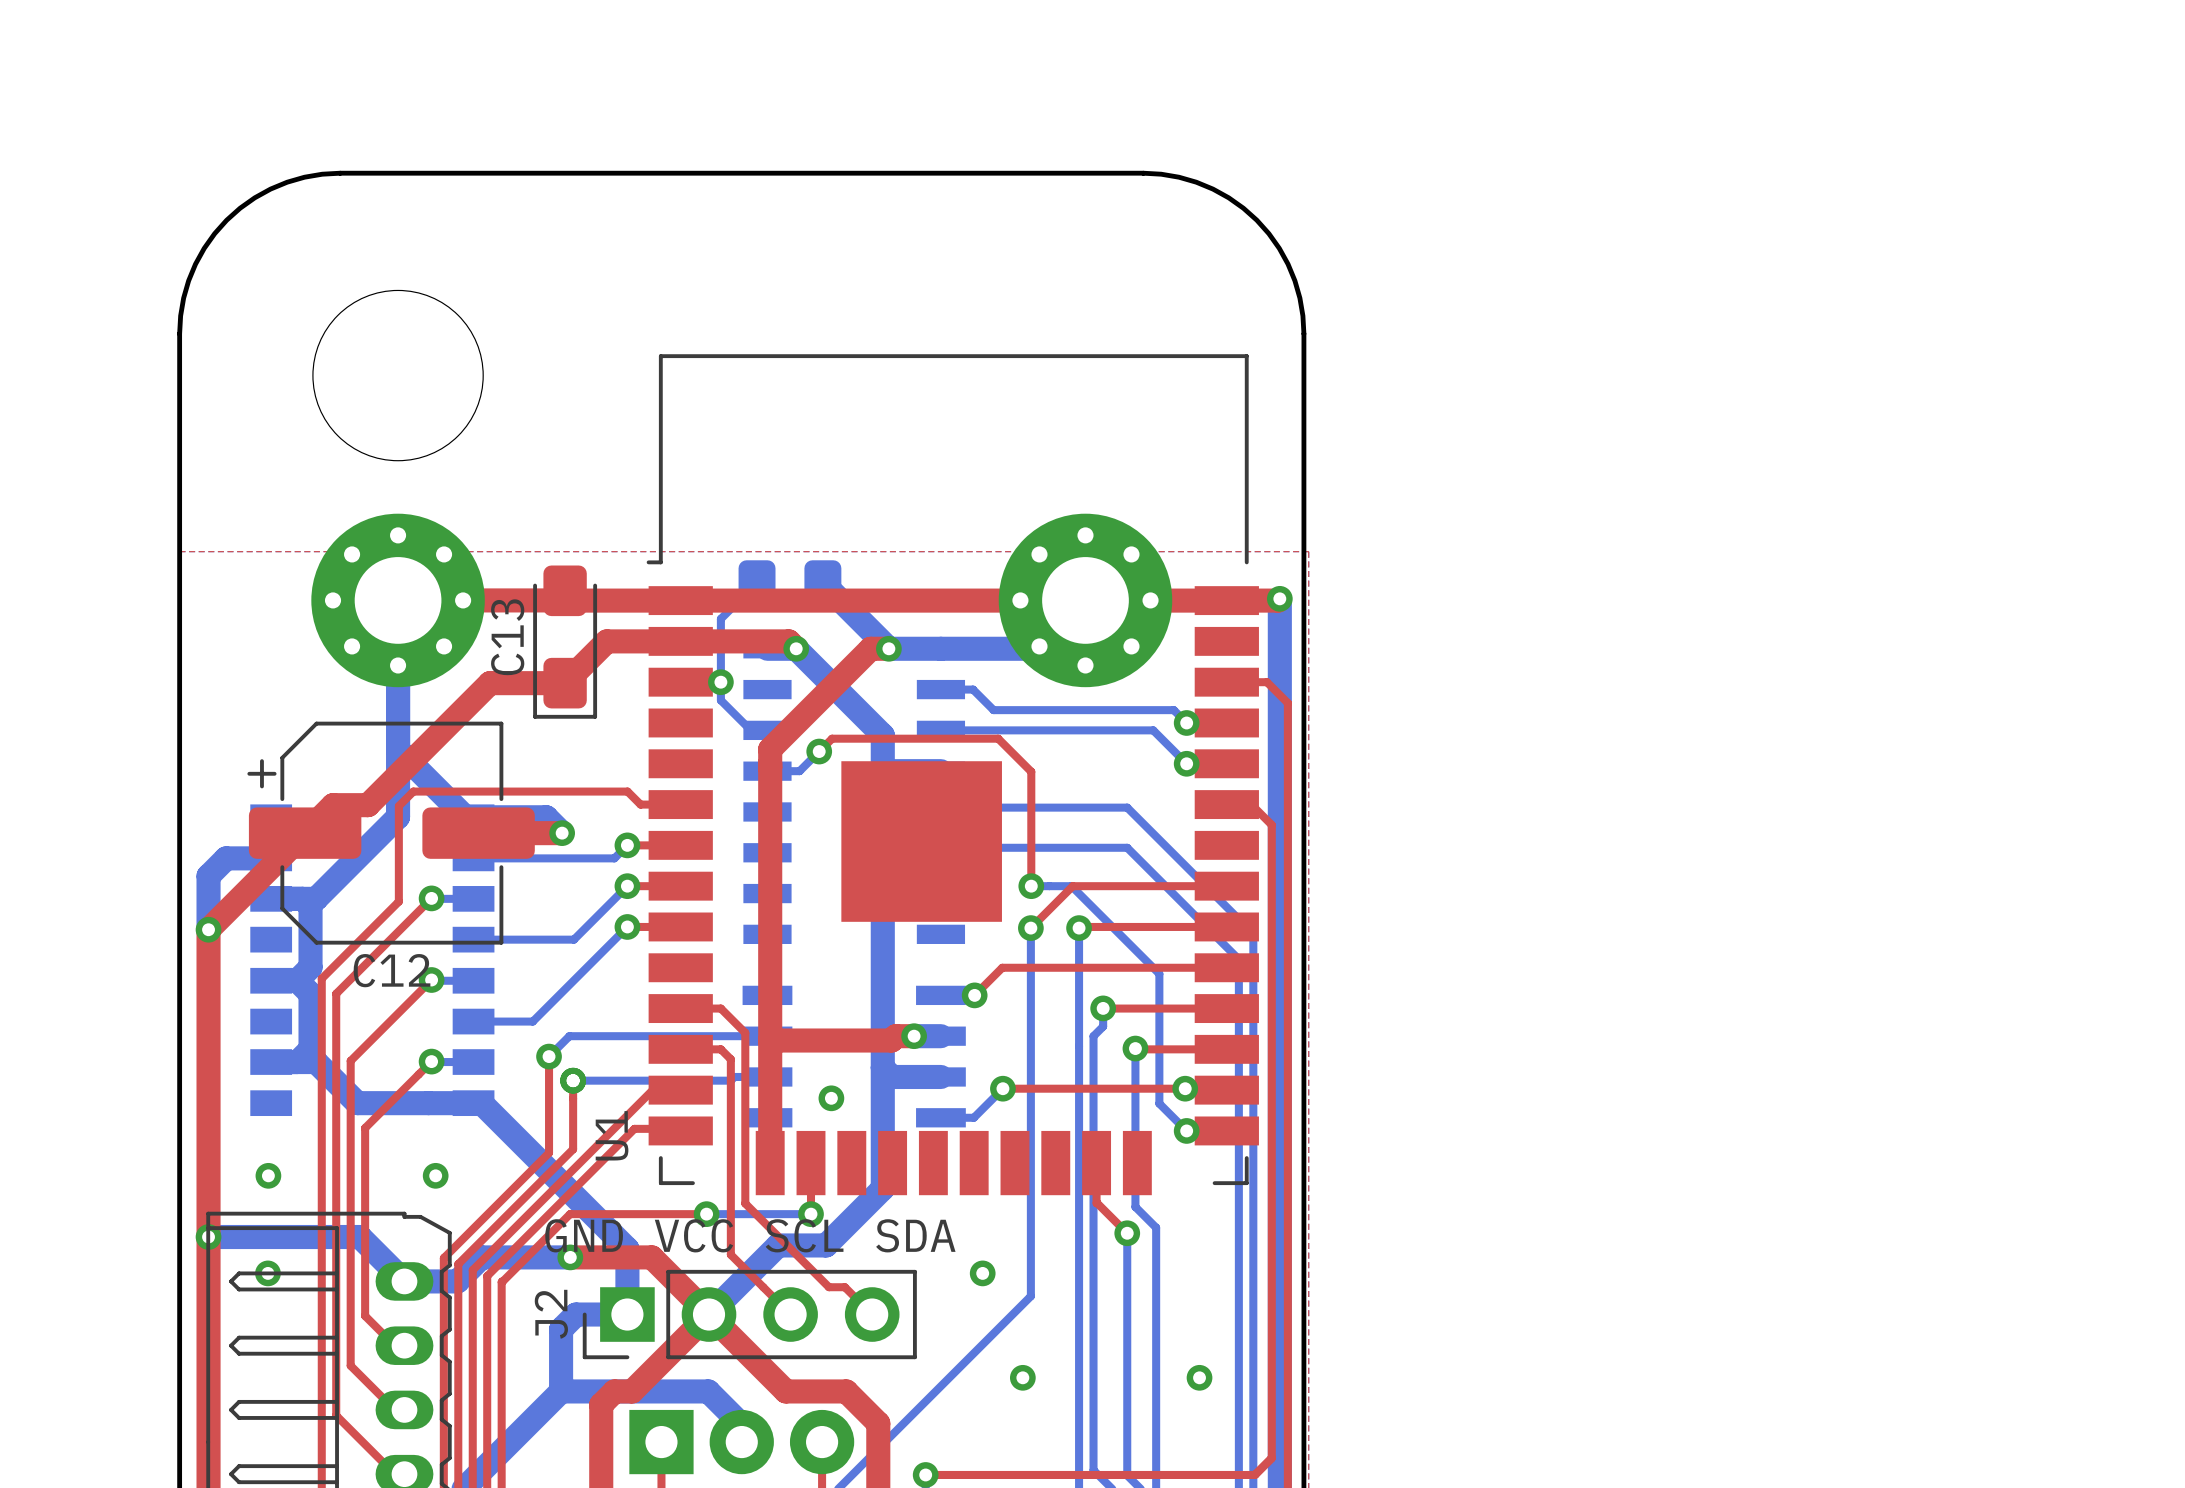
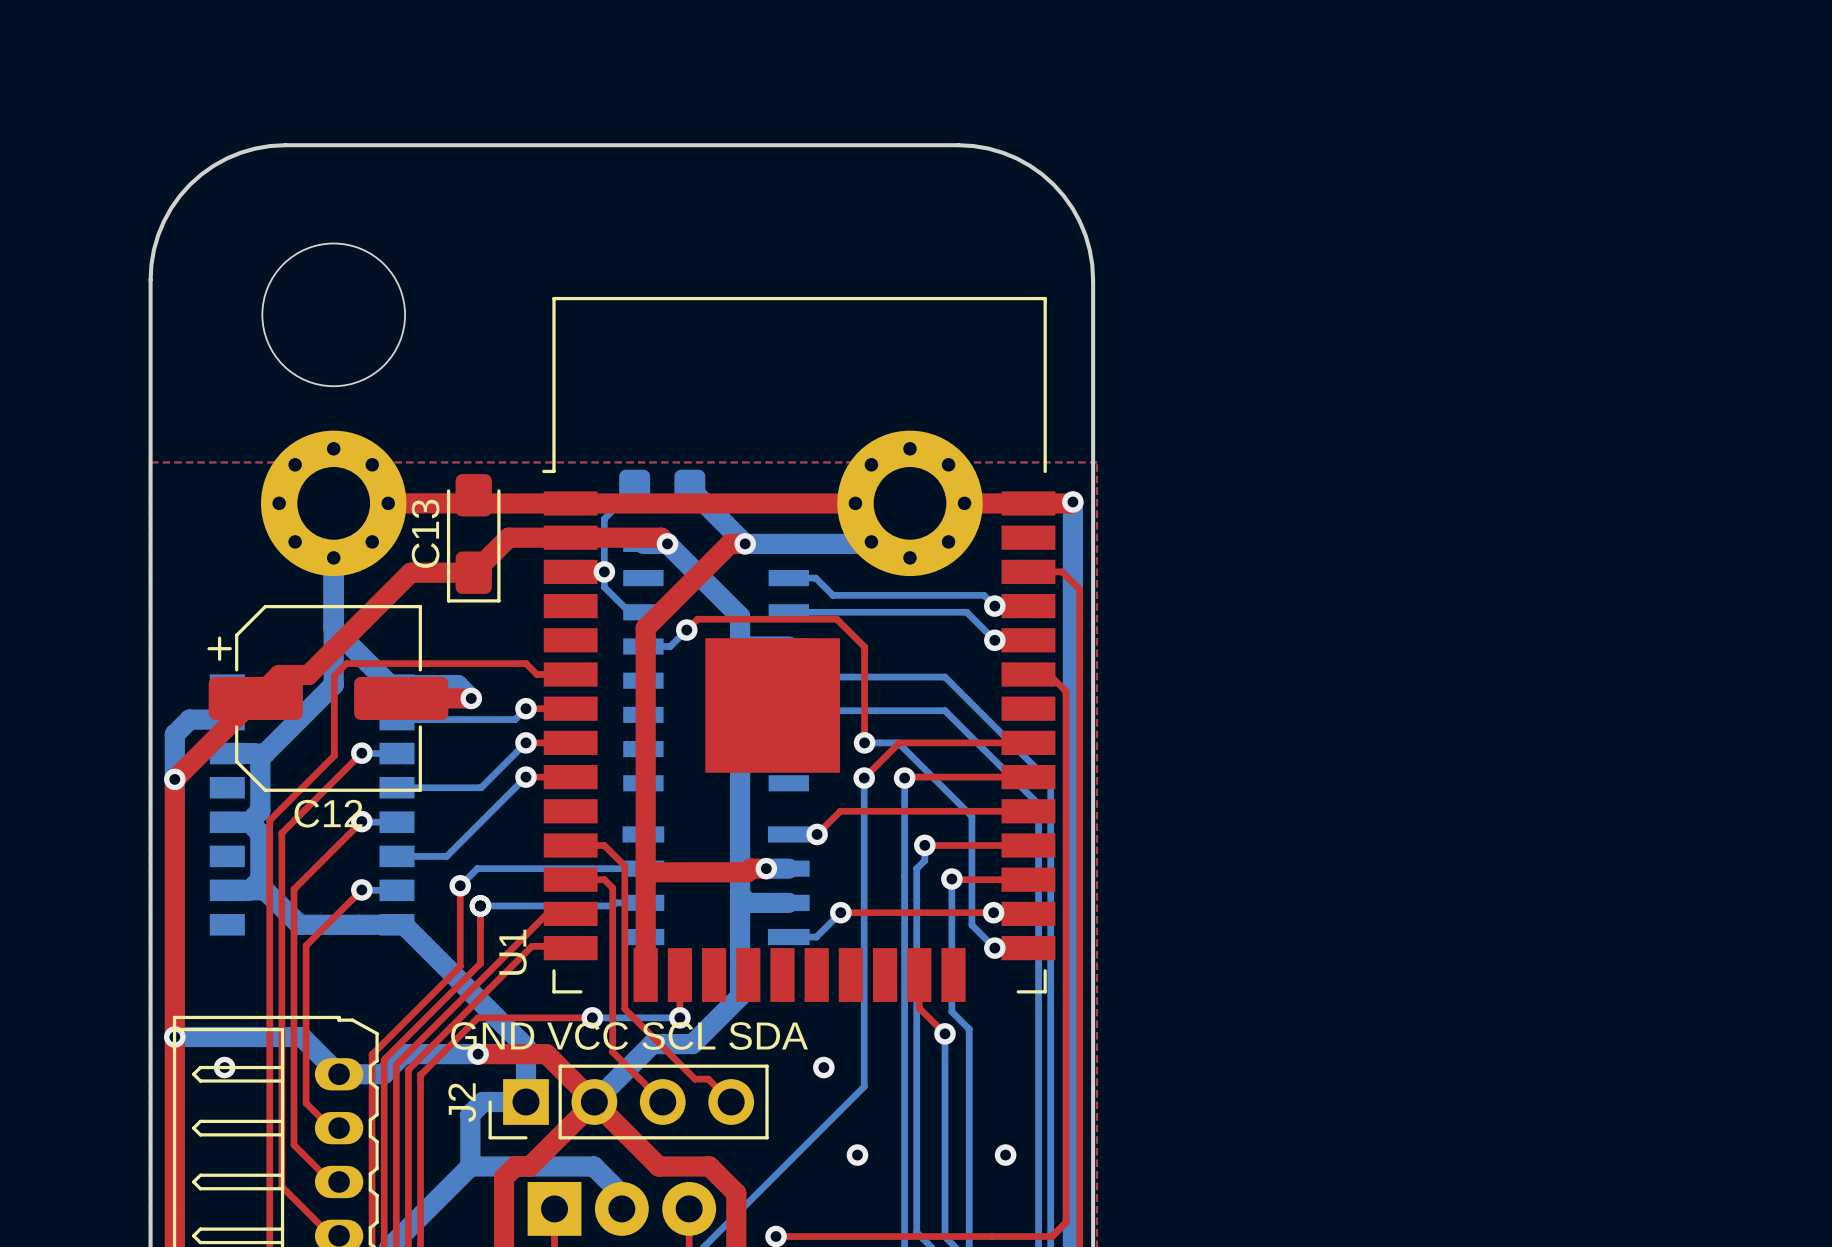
via: (831, 1098) -> none
via: (268, 1175) -> none
via: (435, 1175) -> none

